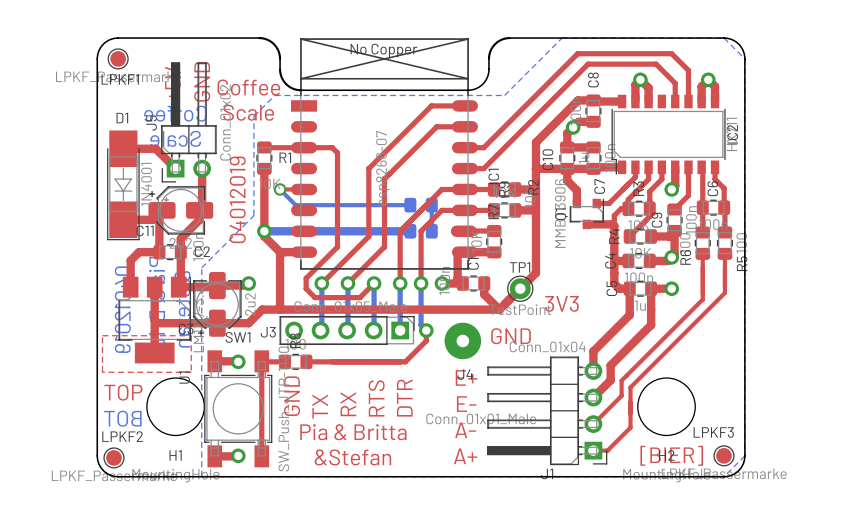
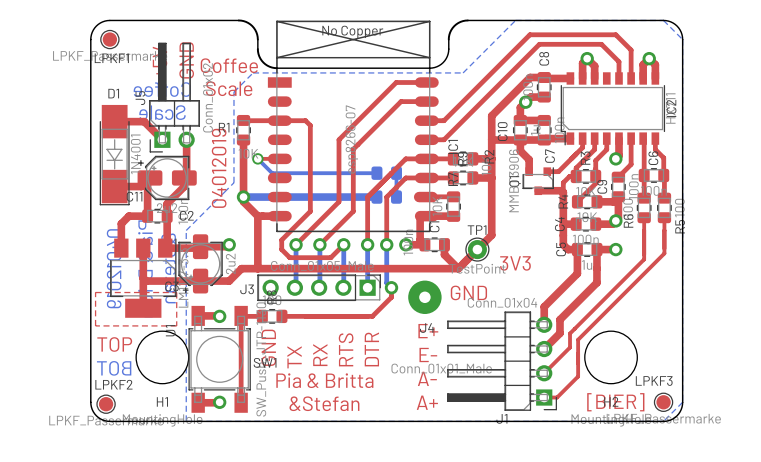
R1 name position: R1 (285, 157) -> R1 (224, 127)
SW1 name position: SW1 (237, 337) -> SW1 (265, 362)

